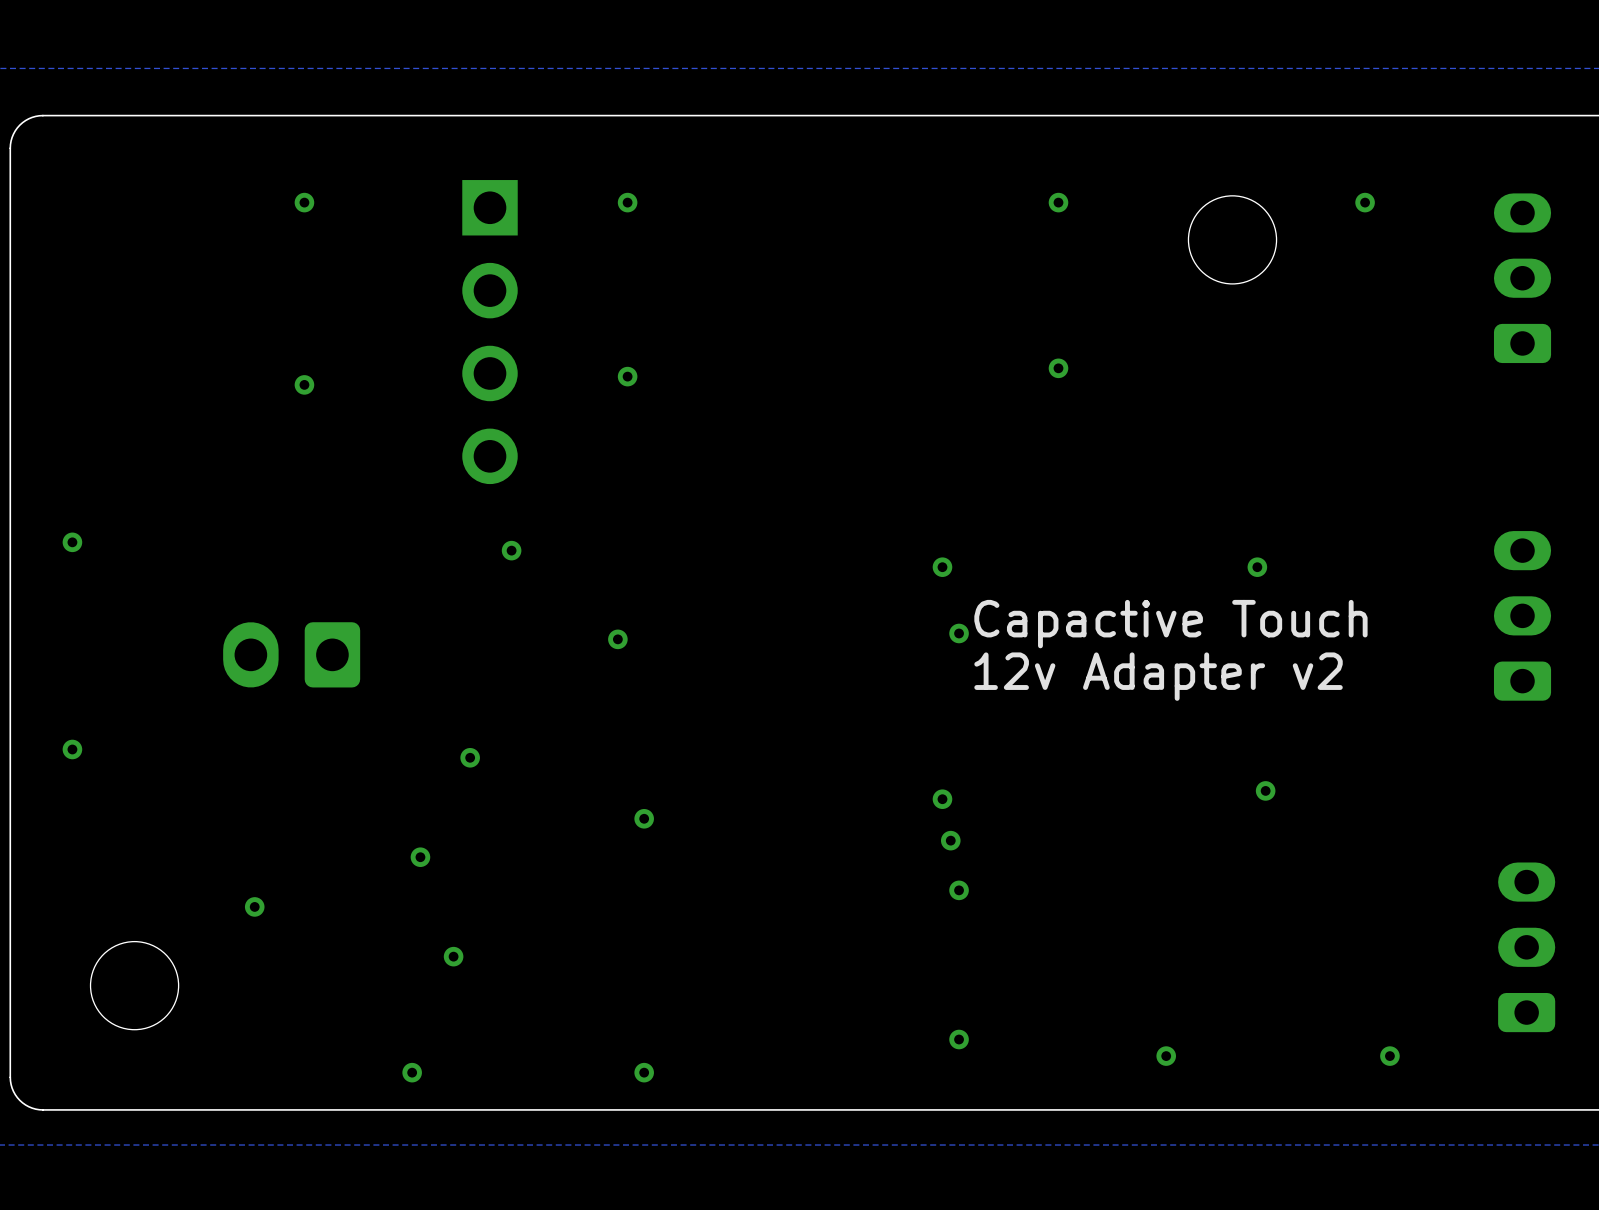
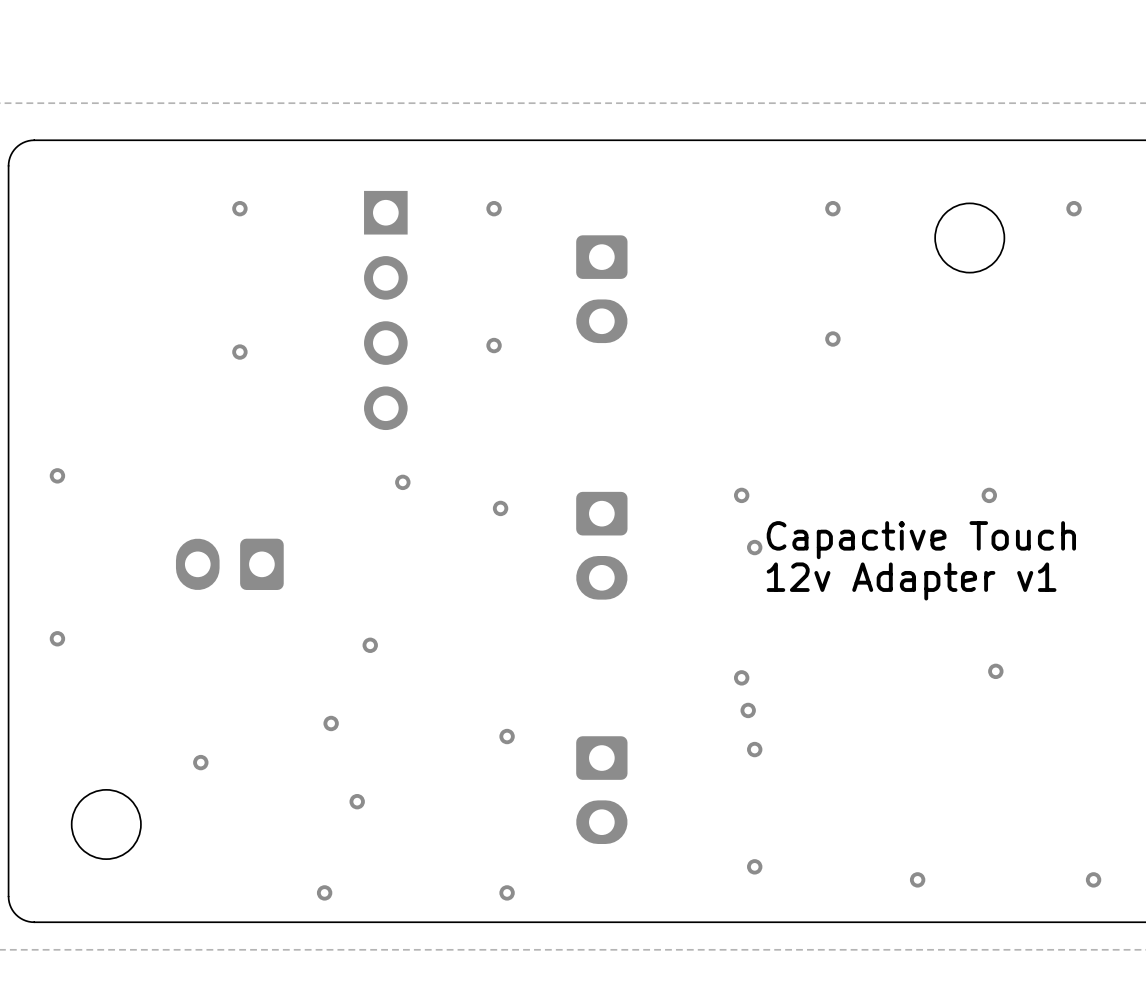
part: none -> (601, 289)
part: none -> (601, 545)
via position: (617, 639) -> (500, 508)
text: 12v Adapter v2 (1158, 676) -> 12v Adapter v1 (911, 581)
via position: (644, 818) -> (507, 736)
part: none -> (601, 790)

